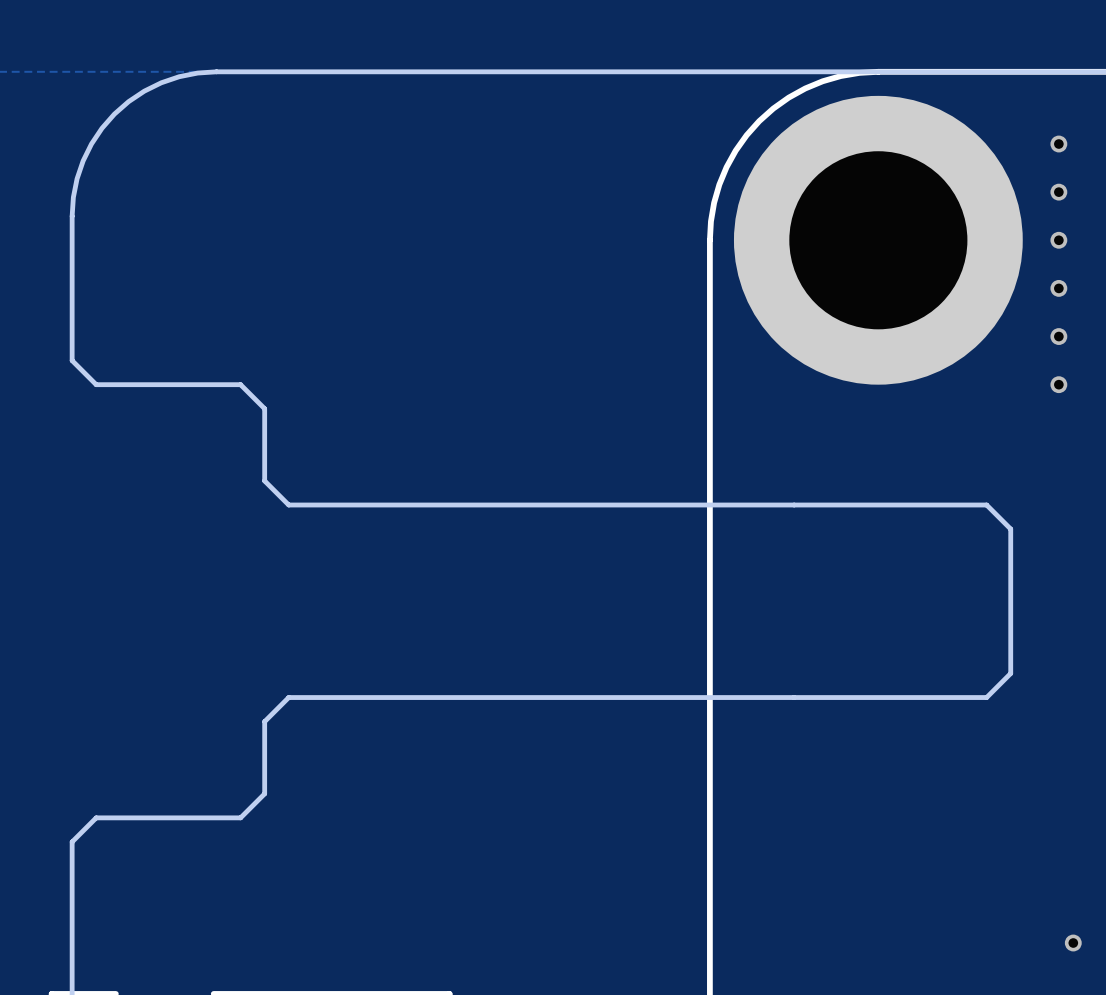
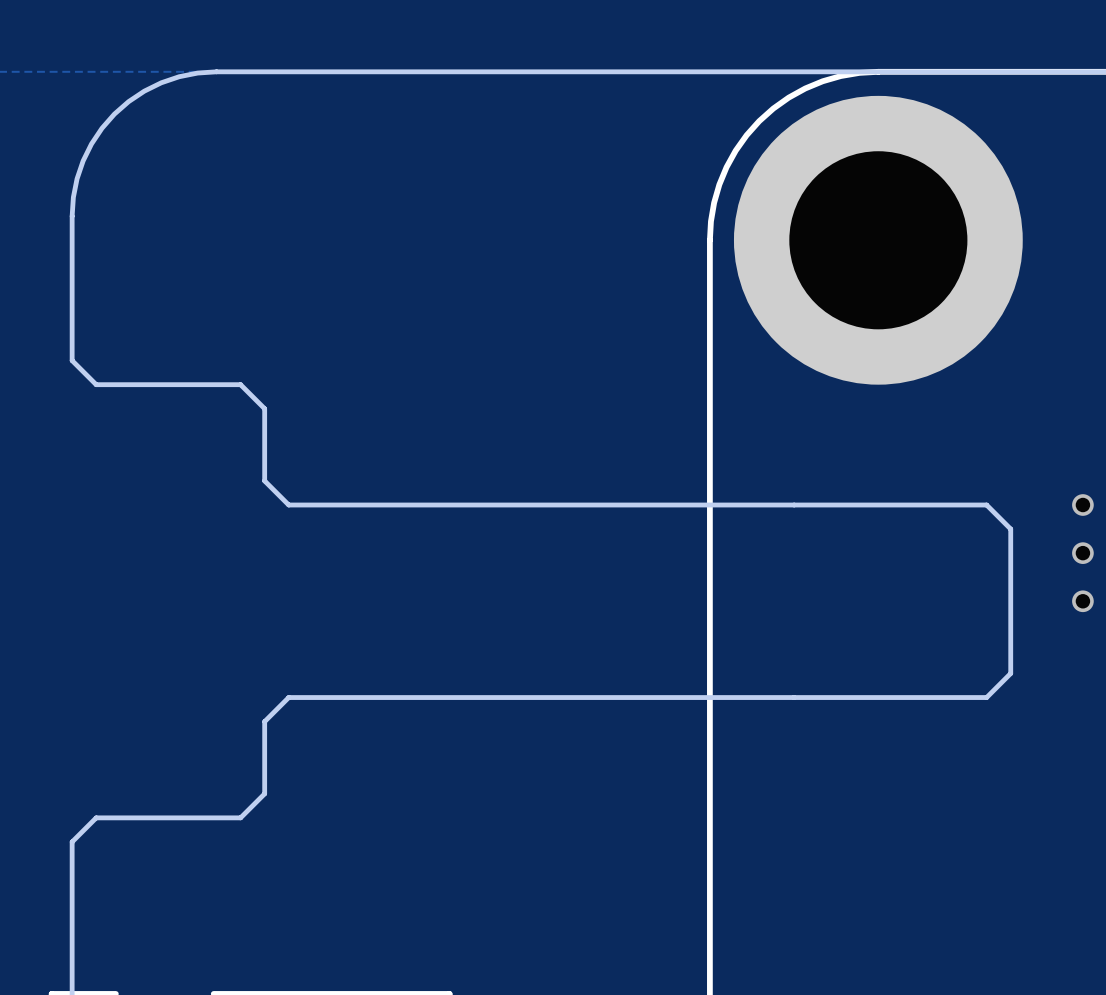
via: (1058, 144) -> none
via: (1058, 192) -> none
via: (1058, 240) -> none
via: (1058, 288) -> none
via: (1058, 336) -> none
via: (1058, 384) -> none
via: none -> (1082, 505)
via: none -> (1082, 553)
via: none -> (1082, 601)
via: (1073, 943) -> none

